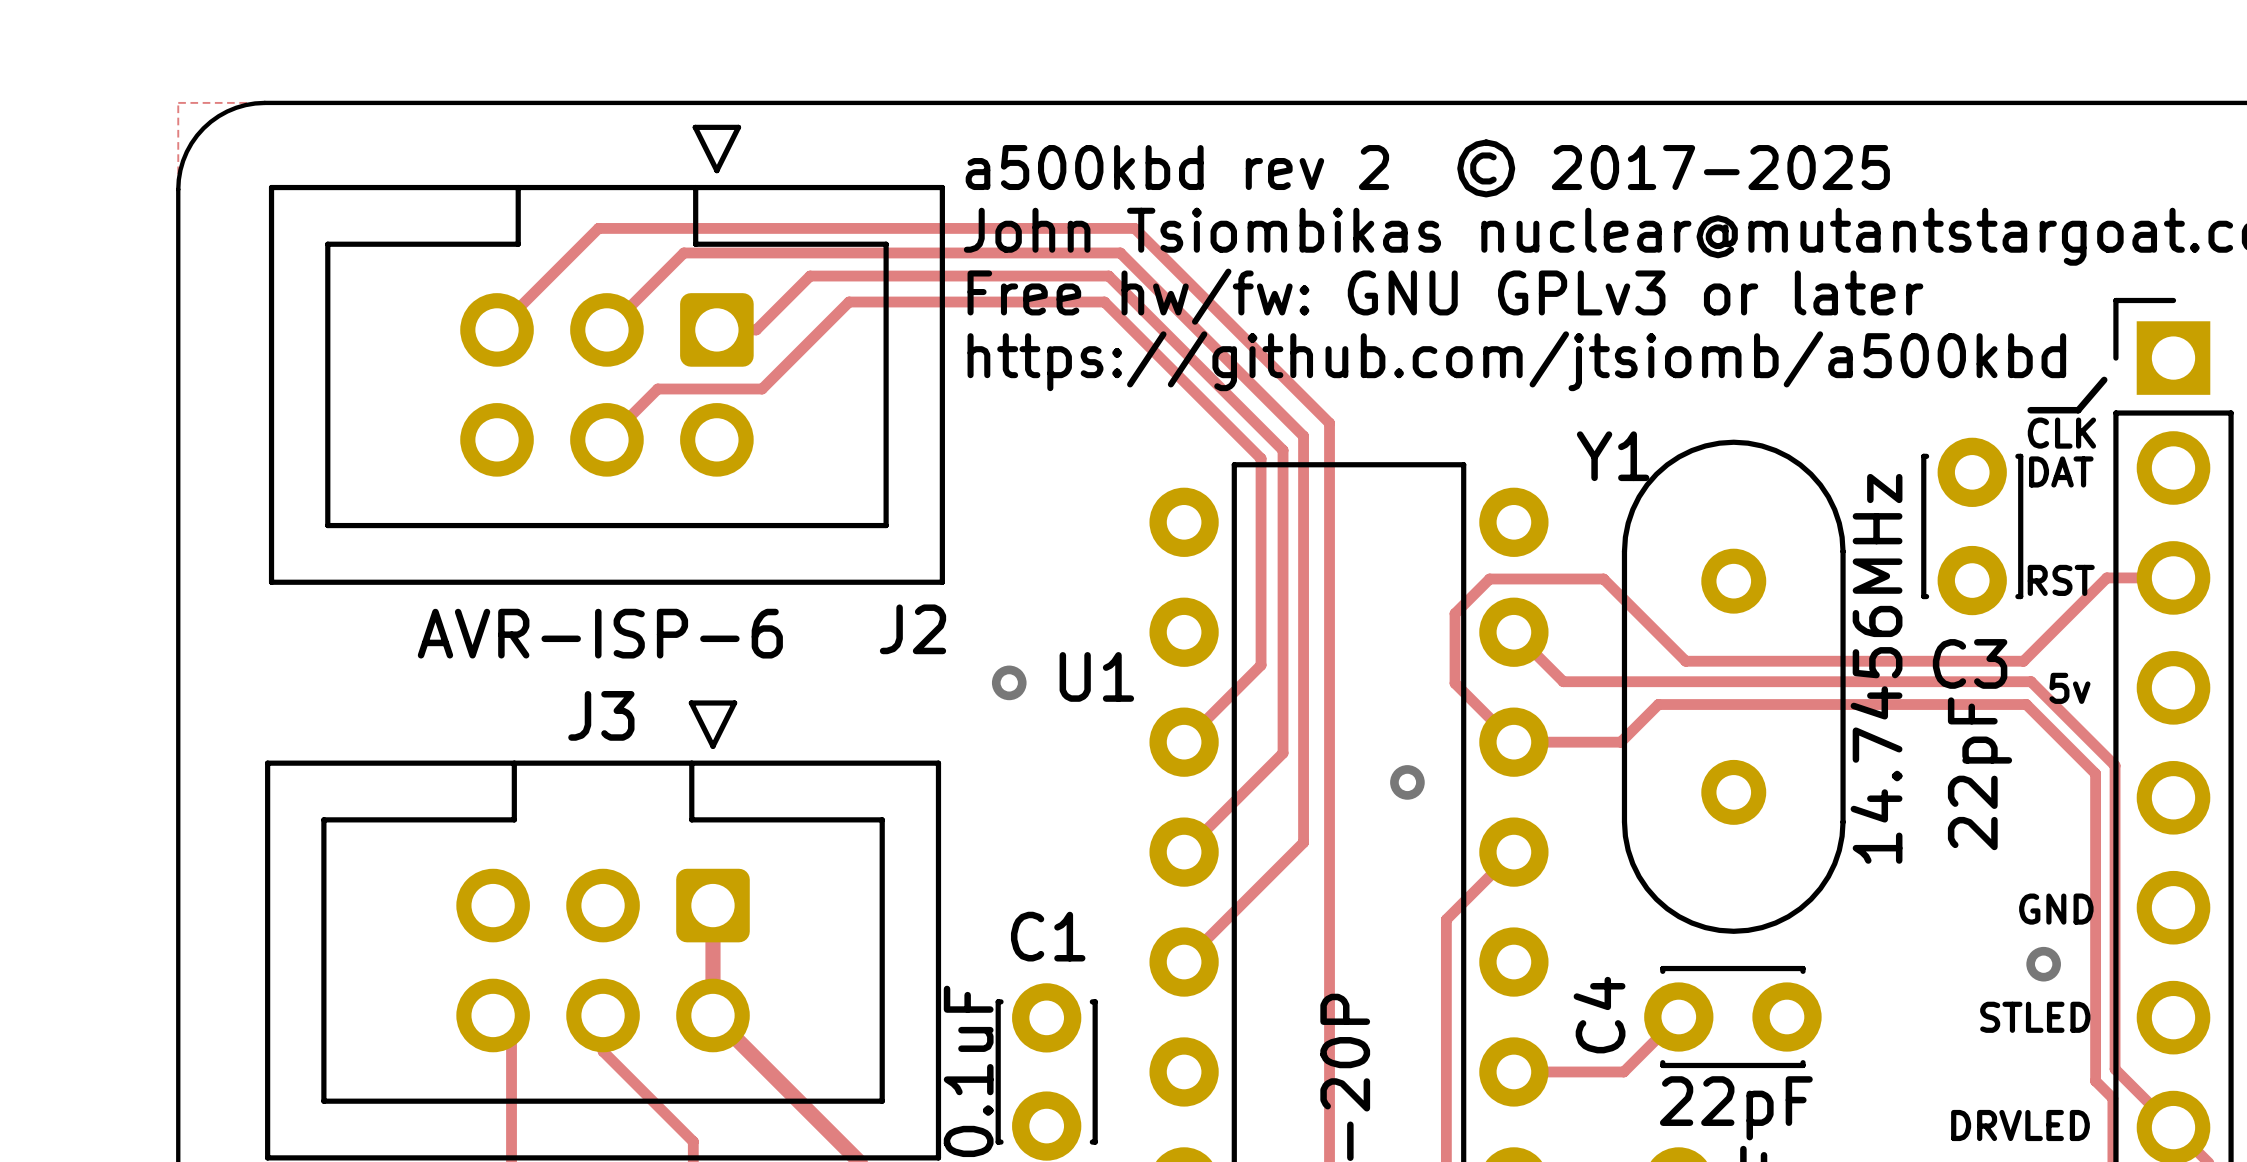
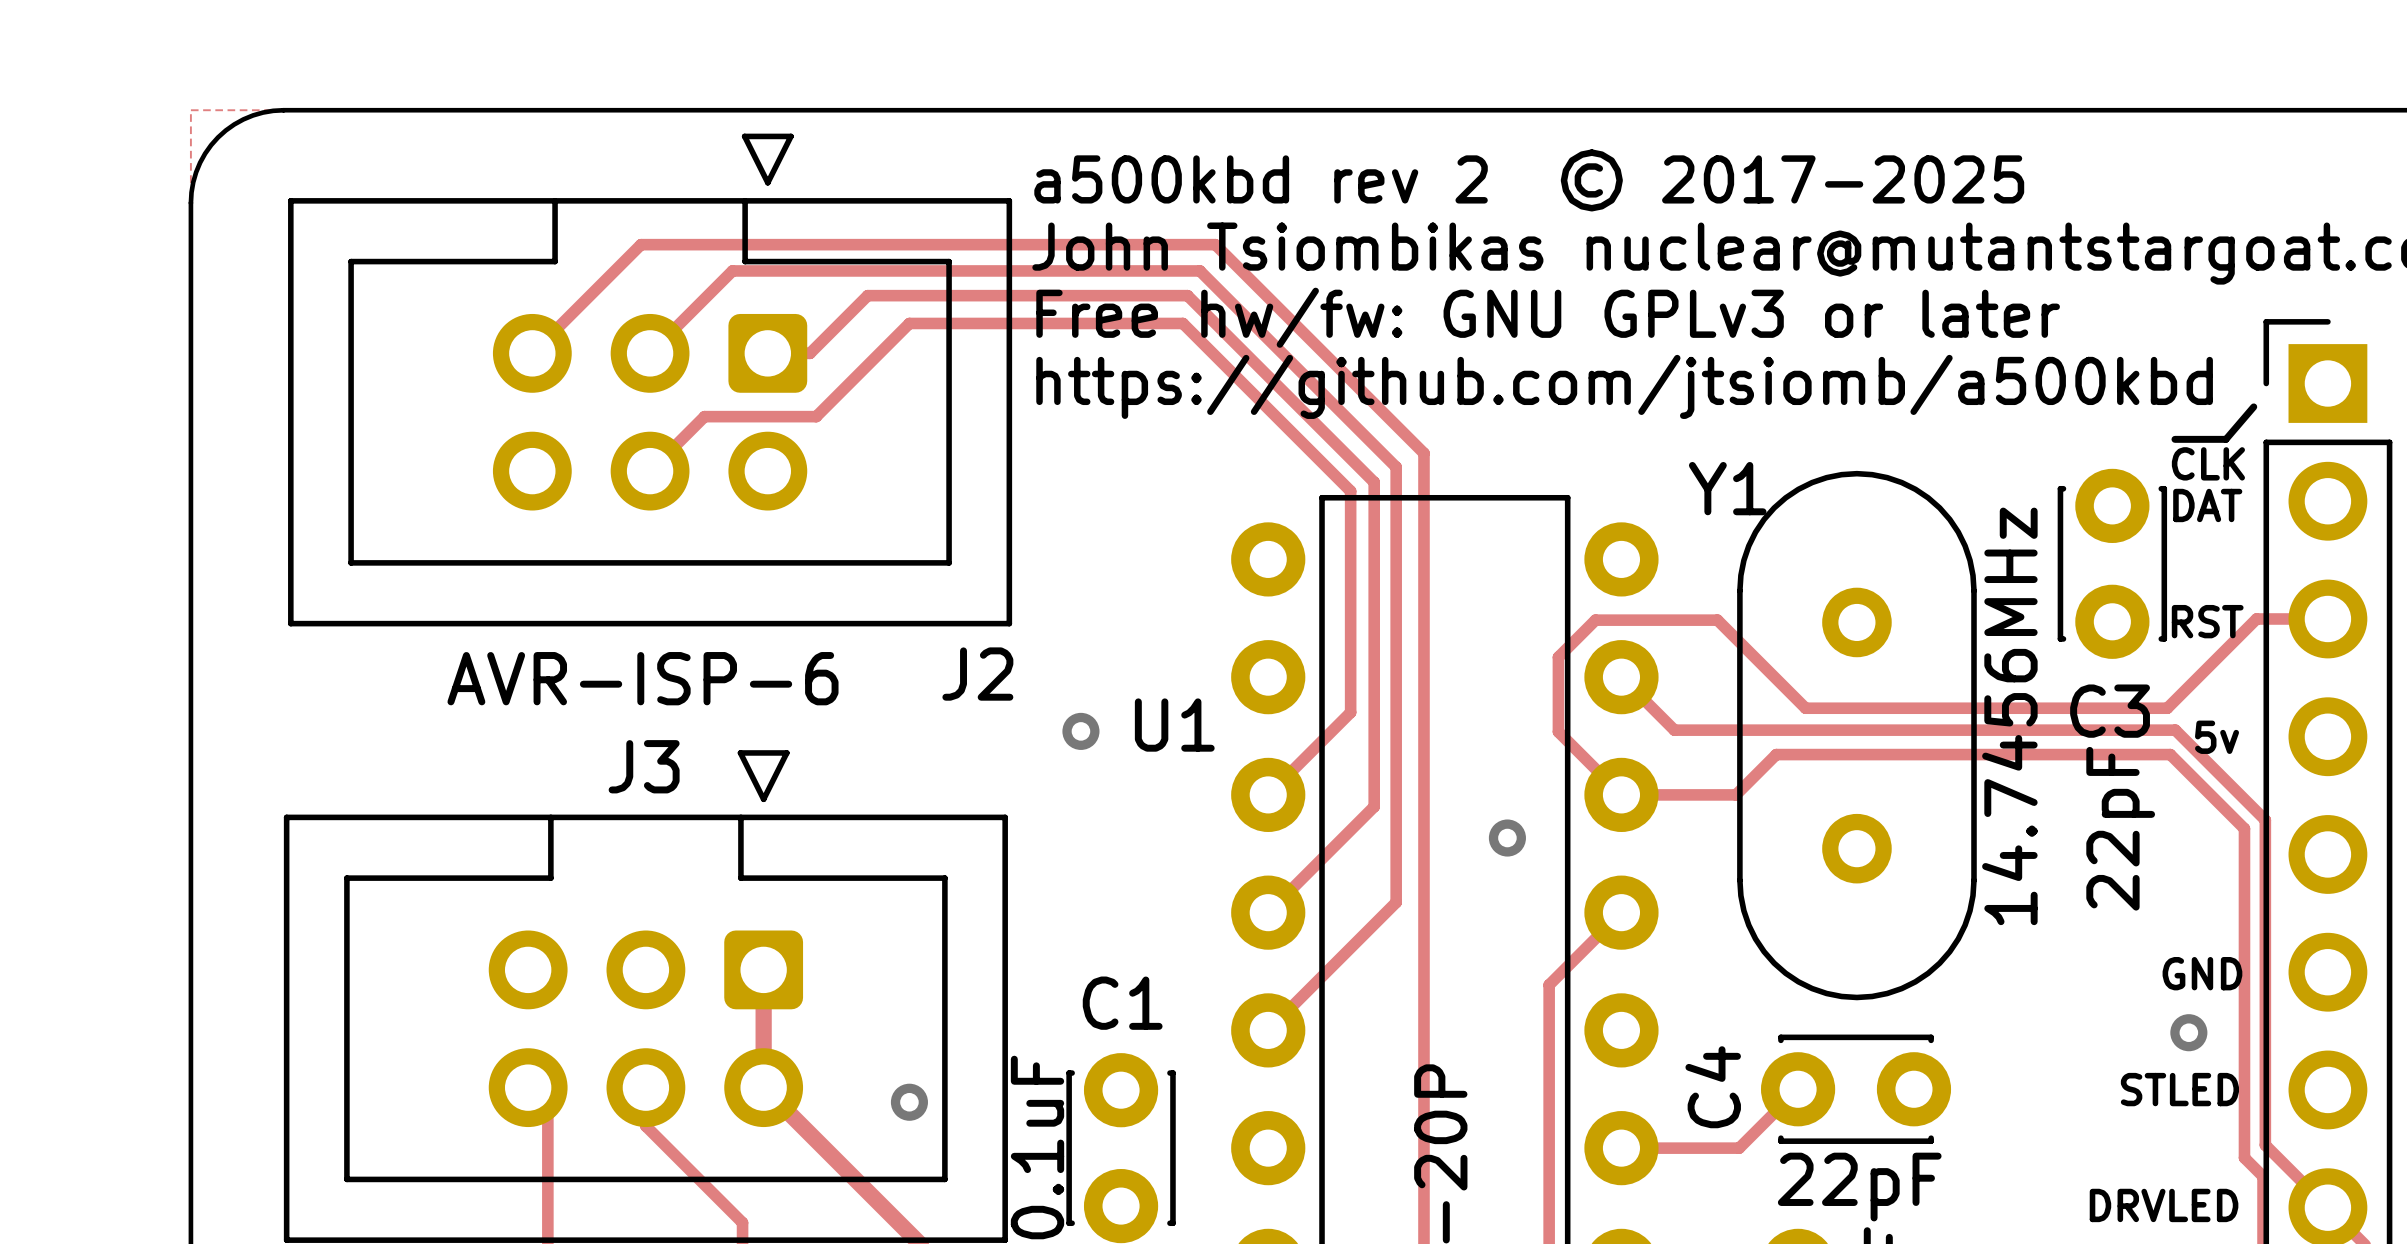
via: none -> (909, 1102)

